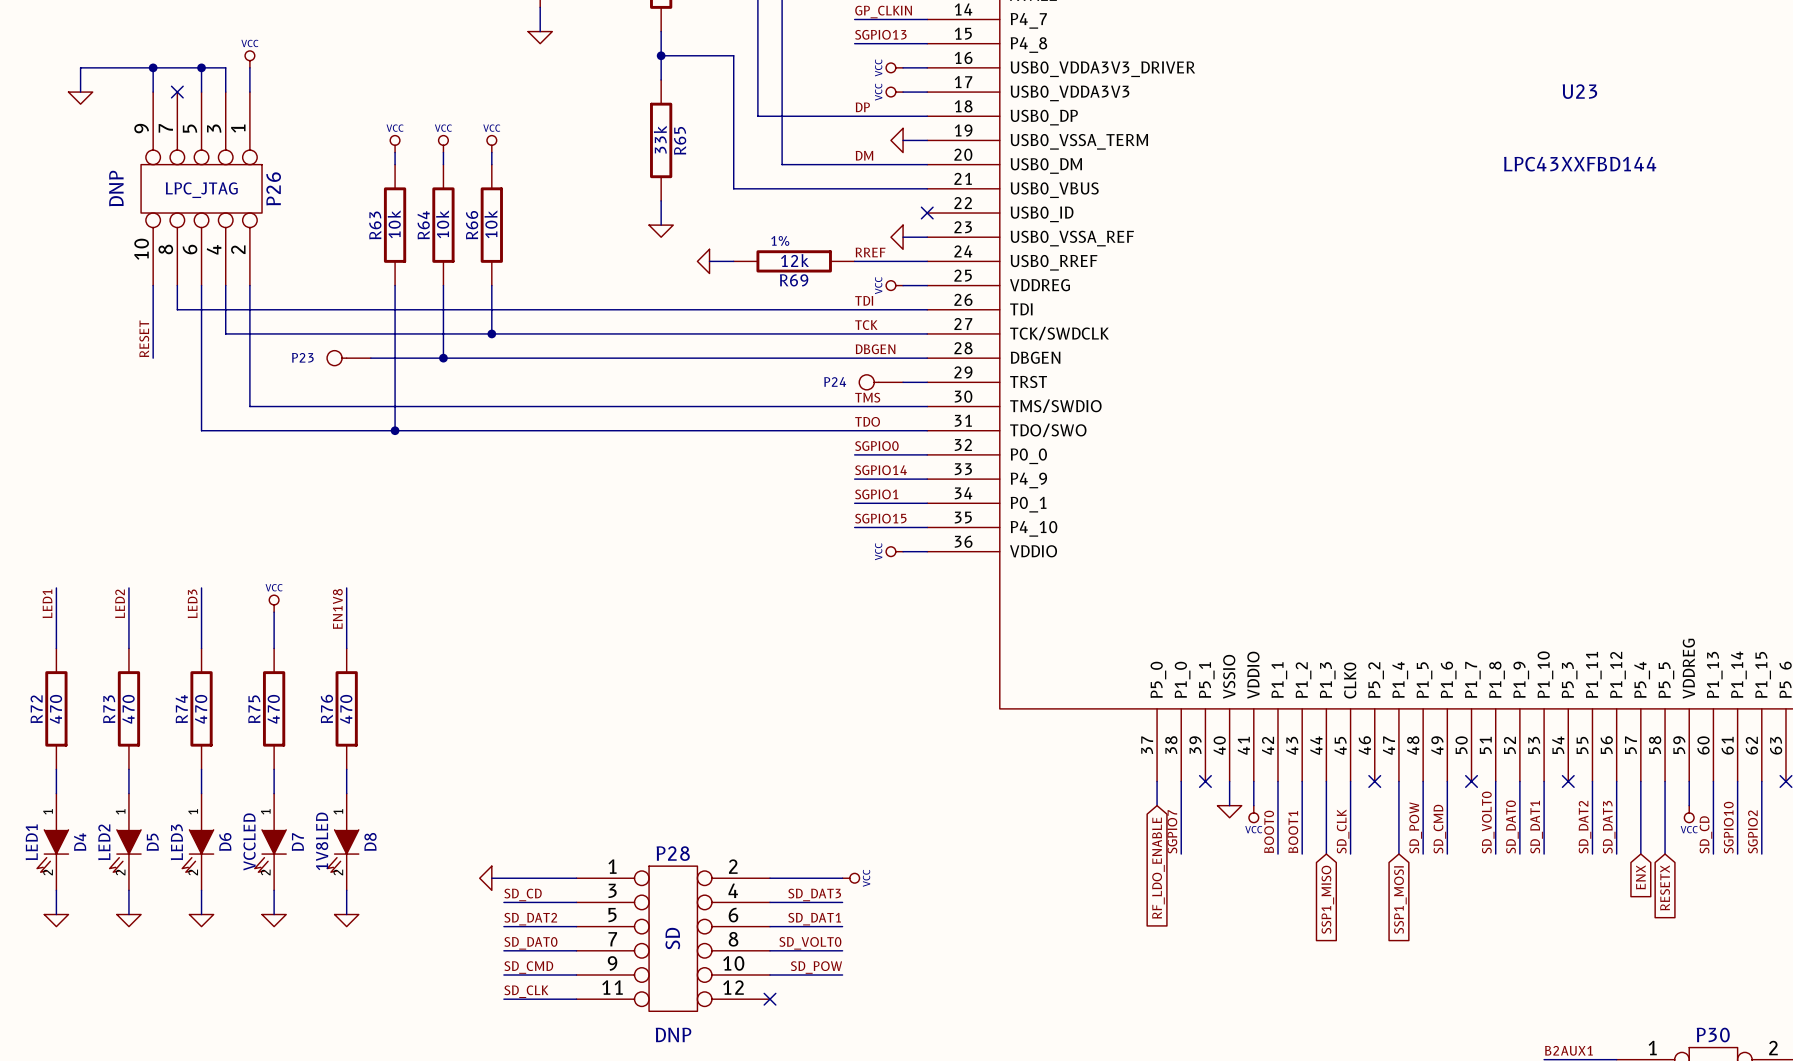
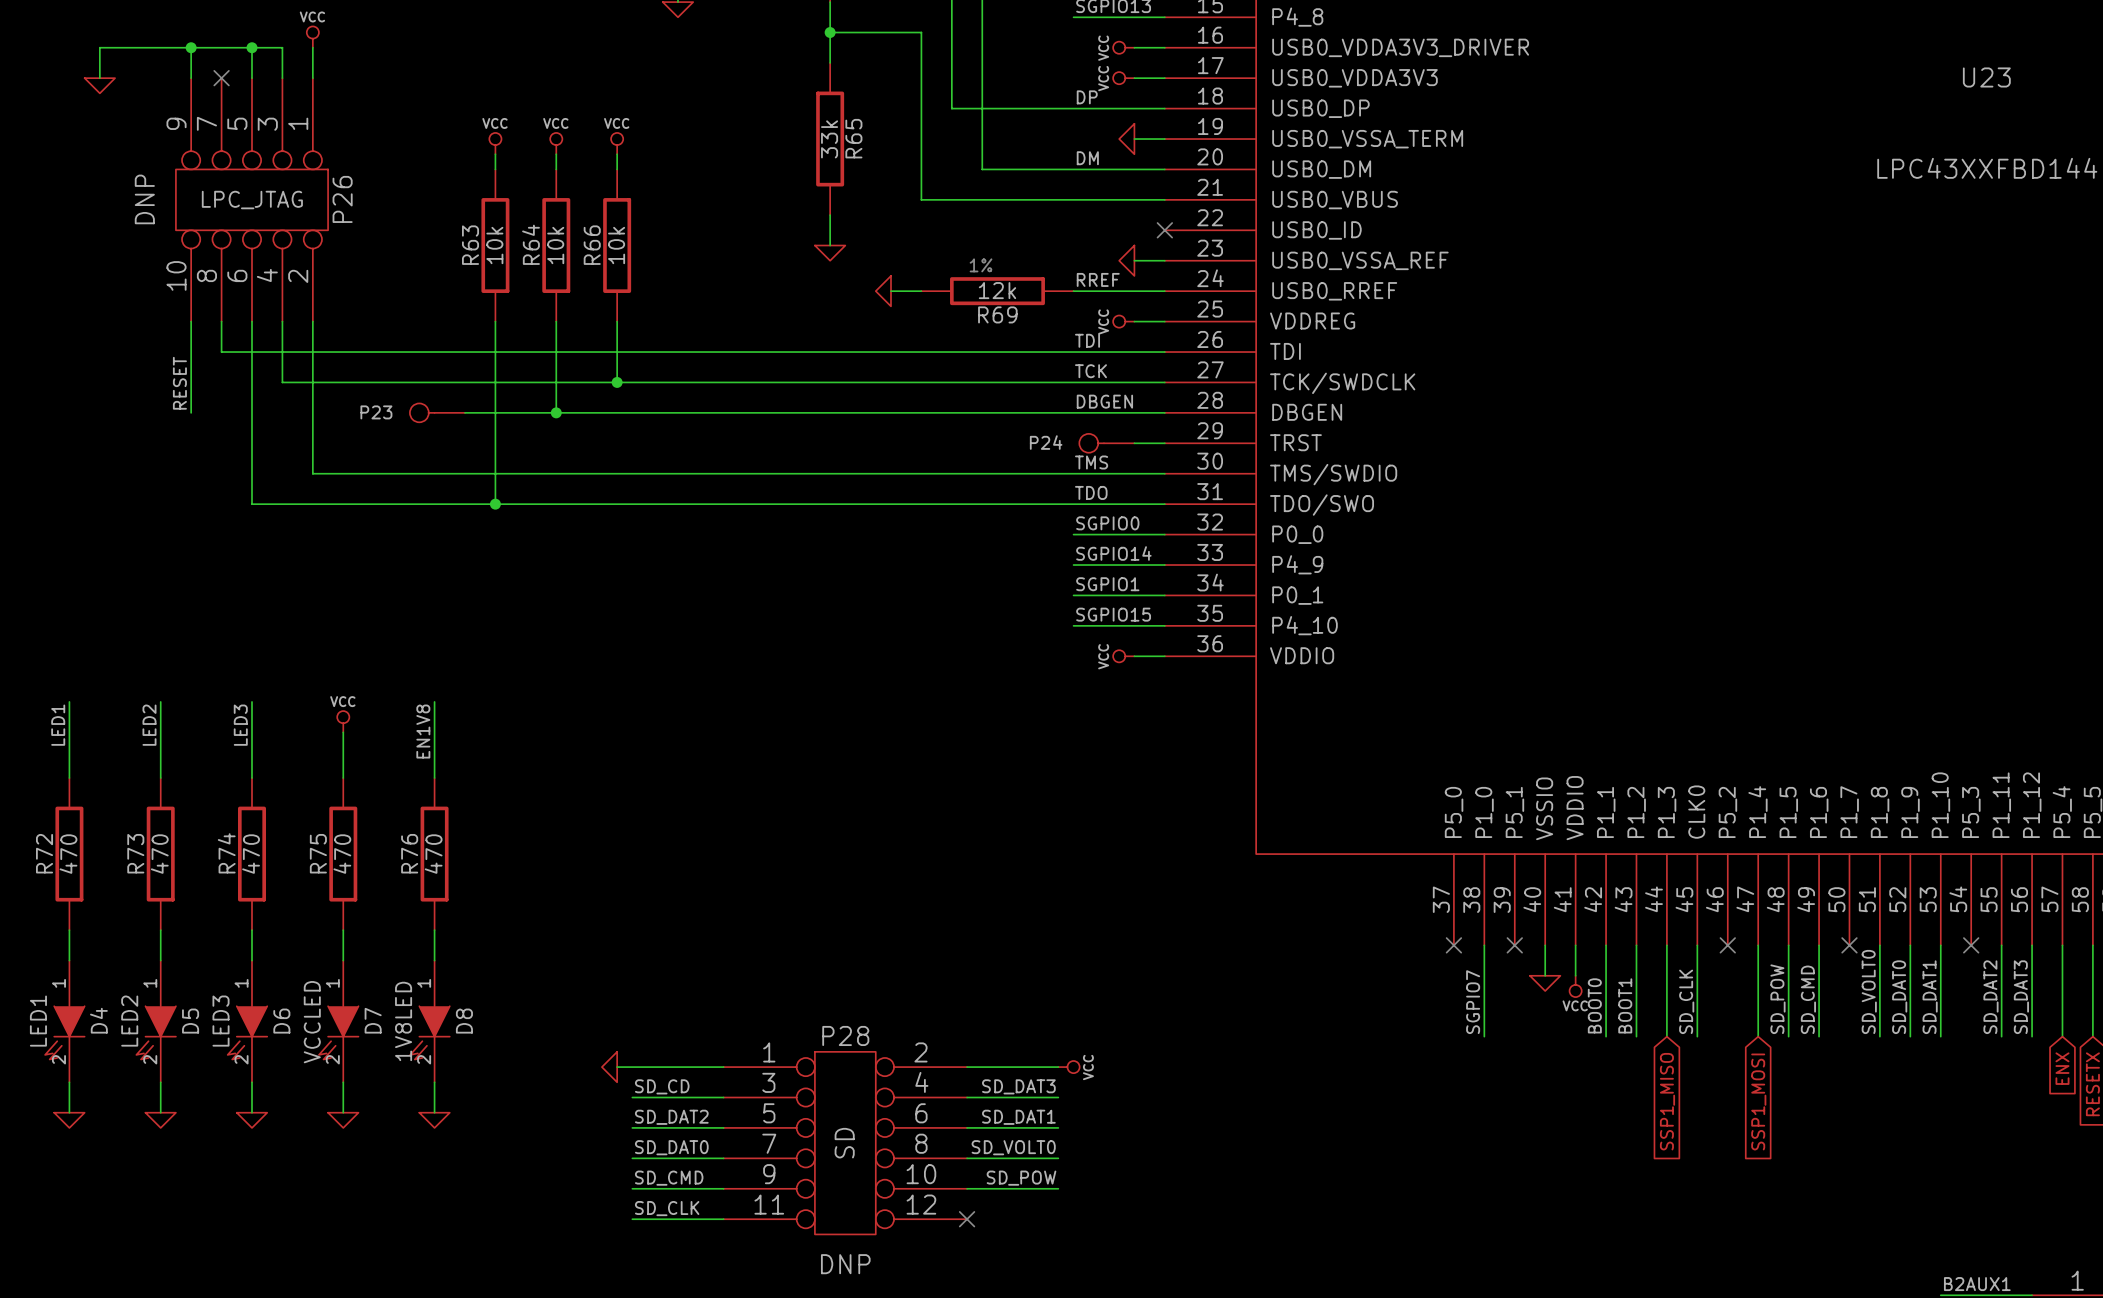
wire: (1157, 781) (1157, 805) -> none
no-connect mark: none -> (1453, 945)
global label: RF_LDO_ENABLE (1158, 868) -> none

